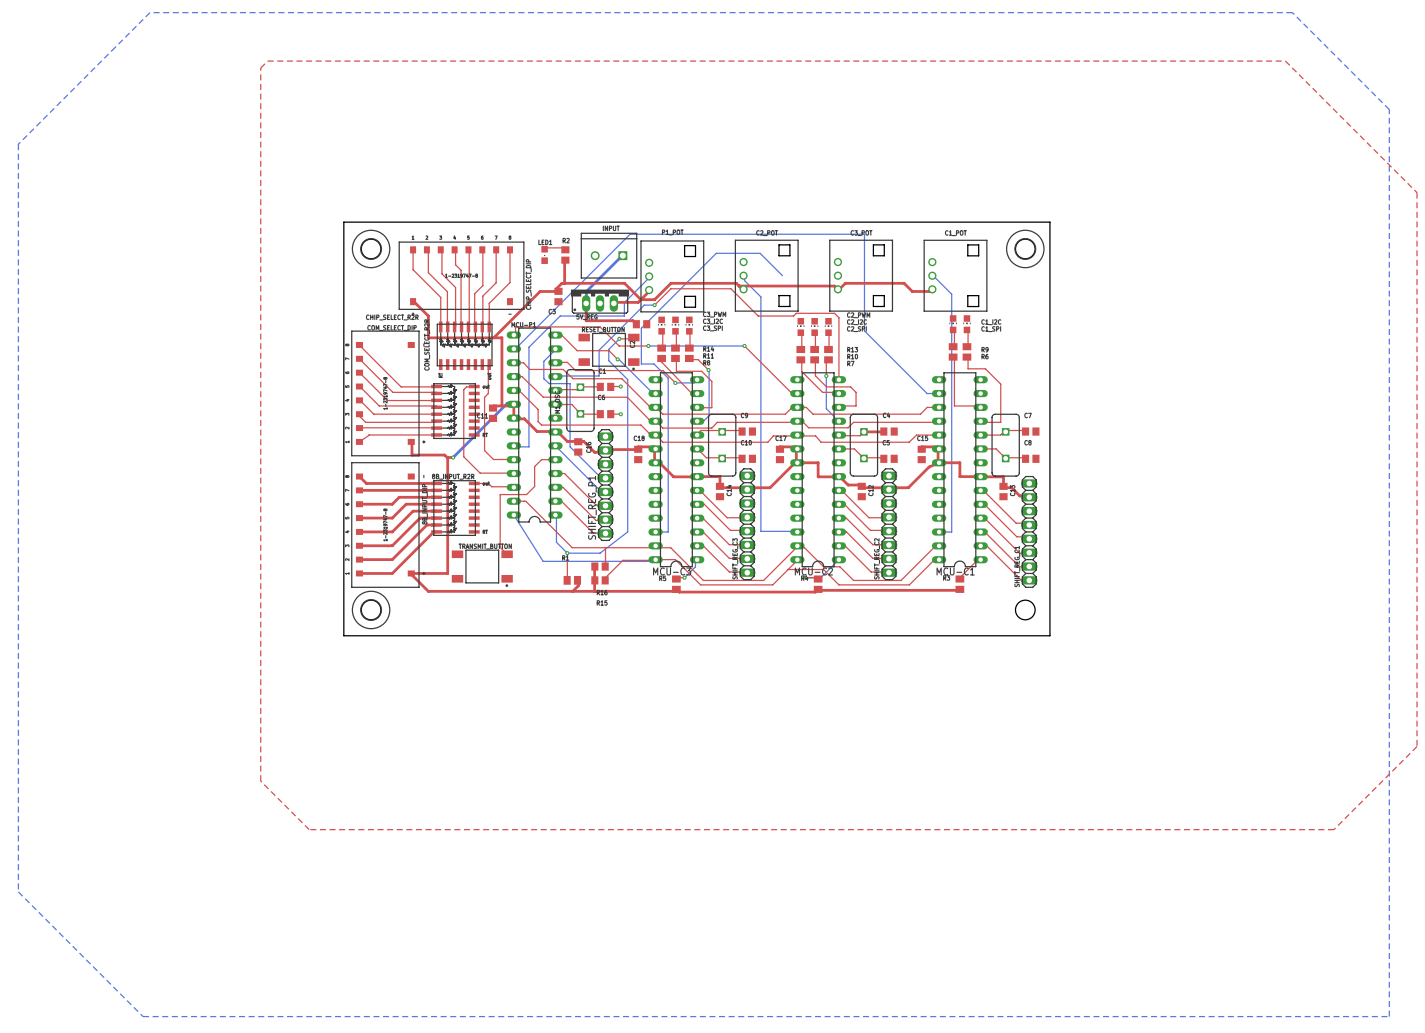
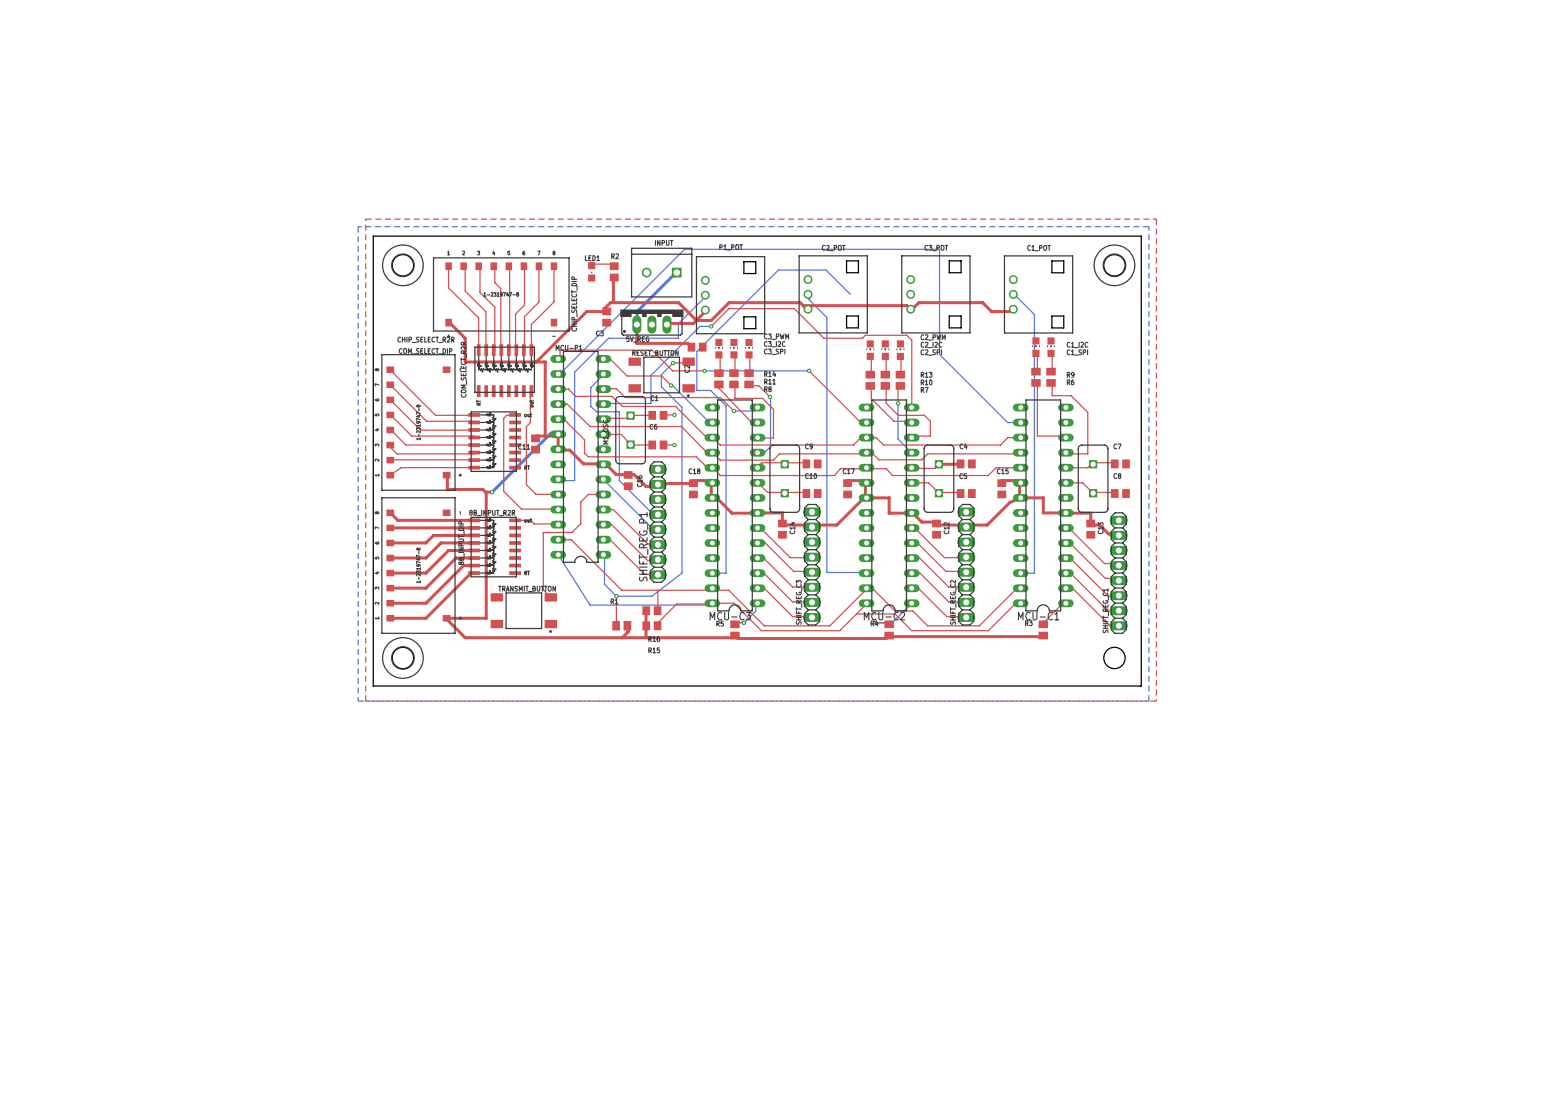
bottom zone outline: (149, 12) (18, 144) (18, 891) (143, 1016) (1389, 1016) (1389, 109) (1292, 12) (149, 12) -> none
top zone outline: (267, 61) (1285, 61) (1417, 192) (1417, 746) (1333, 829) (309, 829) (260, 781) (260, 68) (267, 61) -> none
top zone outline: none -> (365, 219) (1156, 219) (1156, 701) (365, 701) (365, 219)
bottom zone outline: none -> (358, 226) (358, 701) (1148, 701) (1148, 226) (358, 226)

